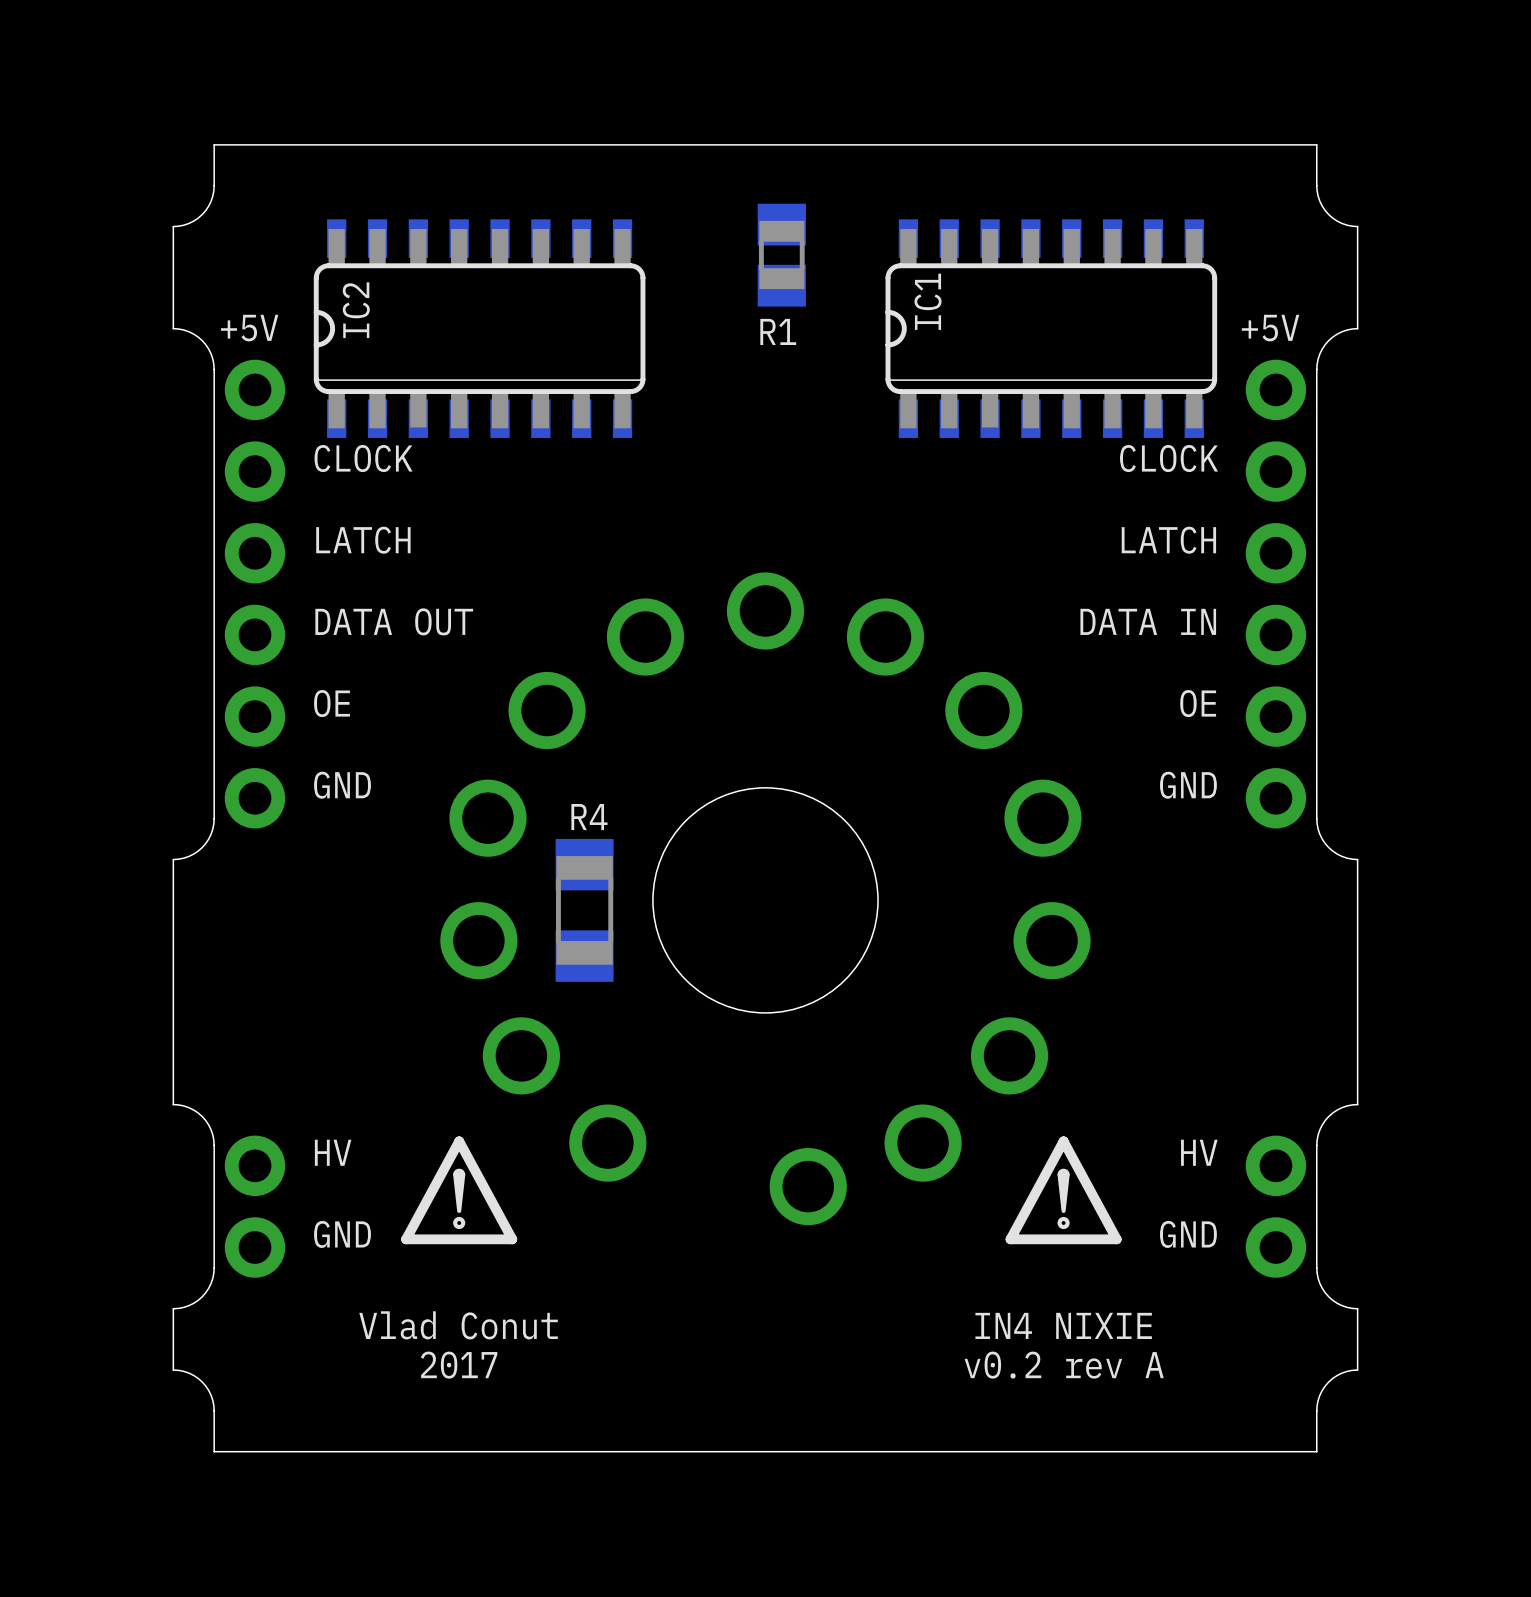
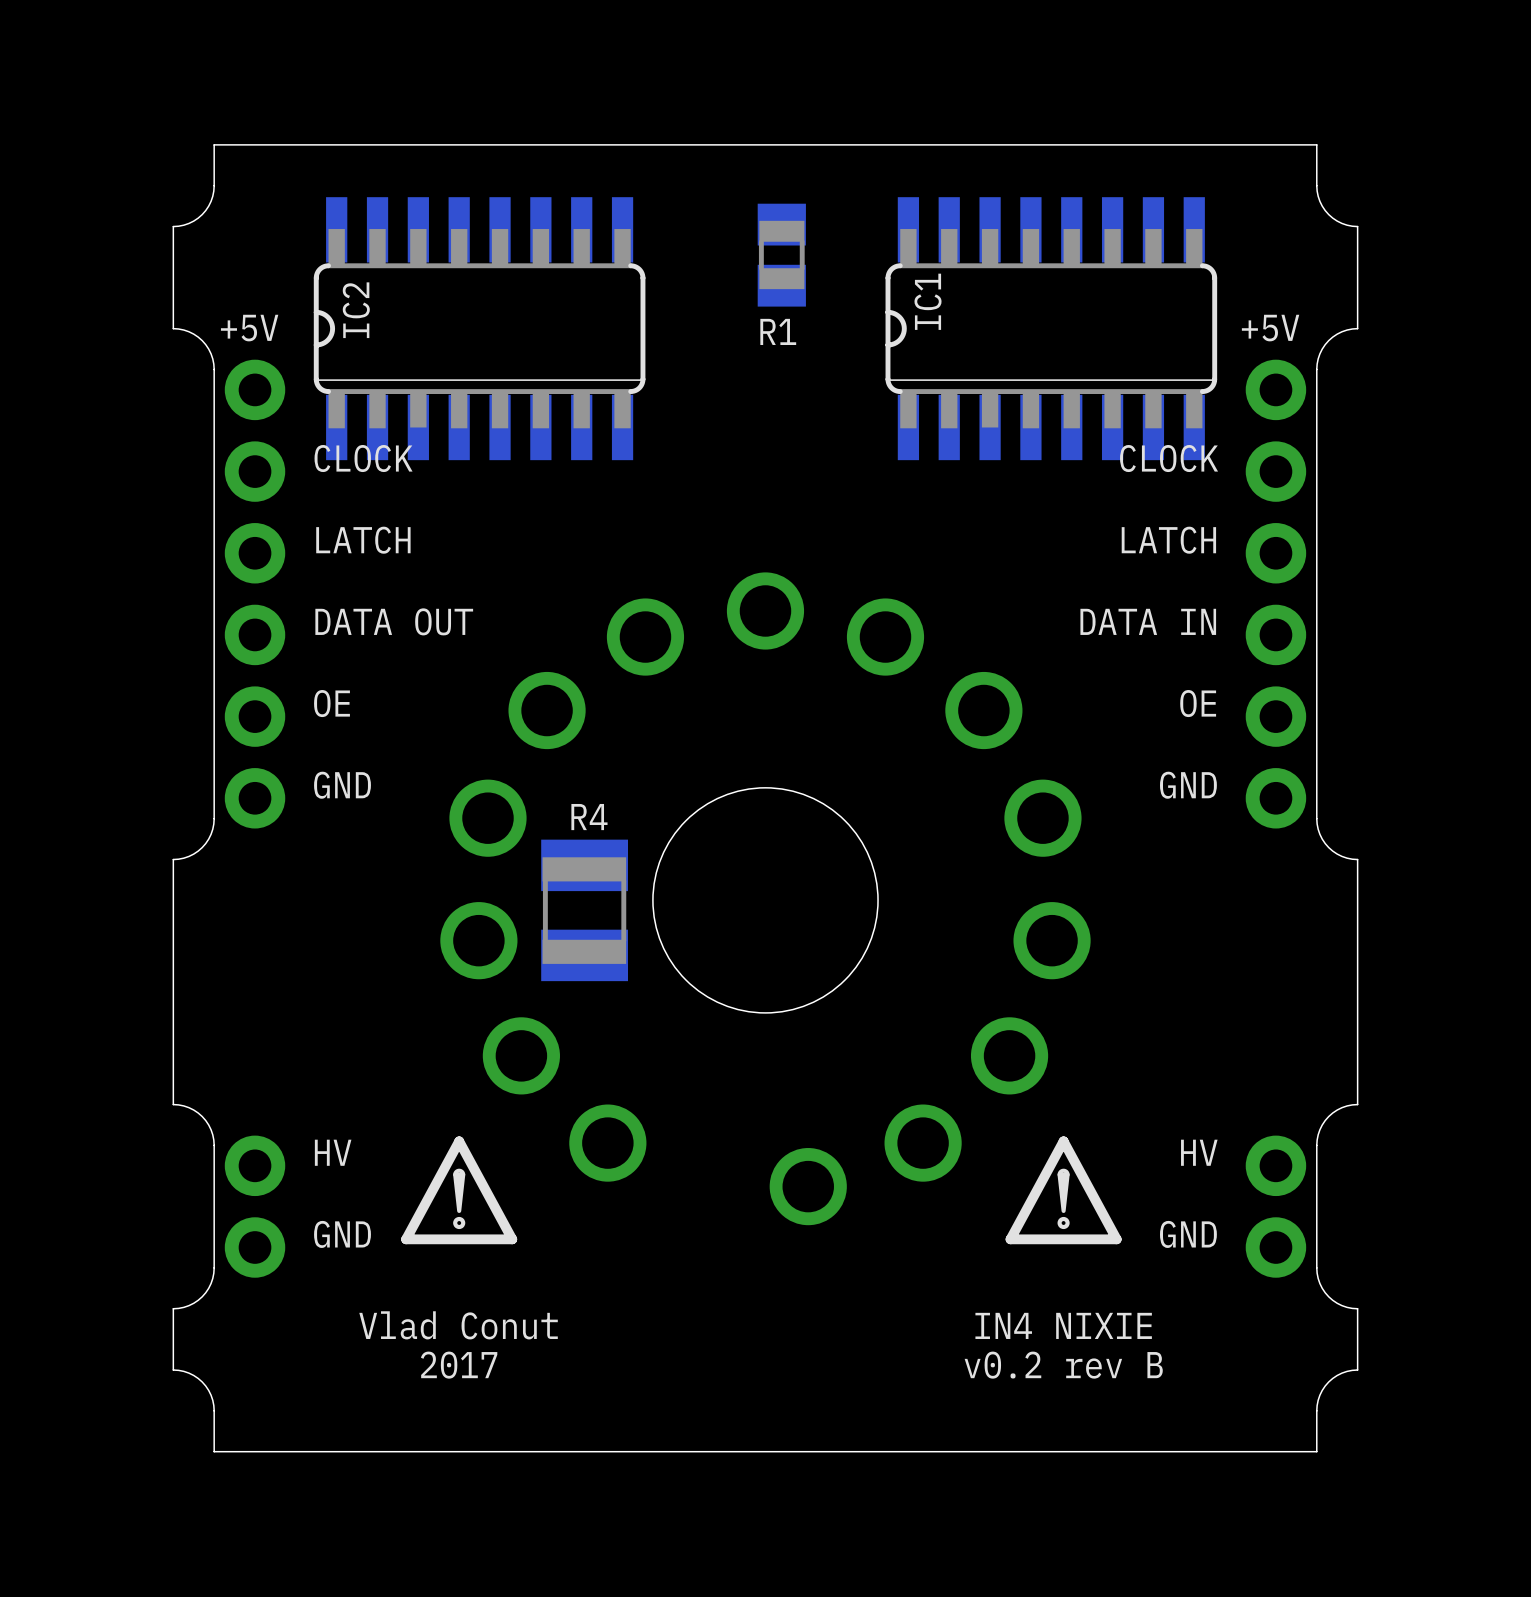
IC2 footprint: [313, 219, 646, 438] -> [313, 197, 646, 461]
IC1 footprint: [885, 219, 1218, 438] -> [885, 197, 1218, 461]
R4 footprint: [555, 838, 614, 982] -> [541, 839, 629, 982]
text: v0.2 rev A (1064, 1365) -> v0.2 rev B (1063, 1365)

